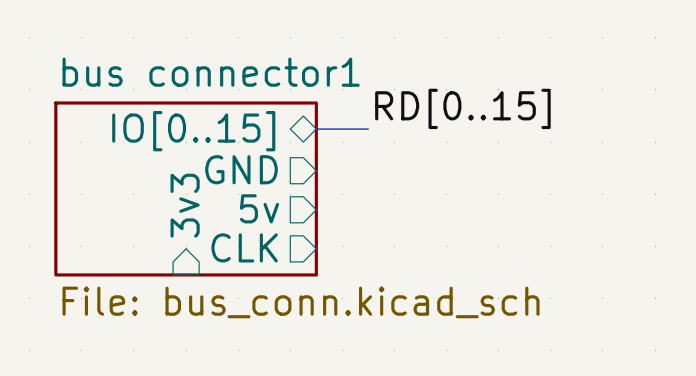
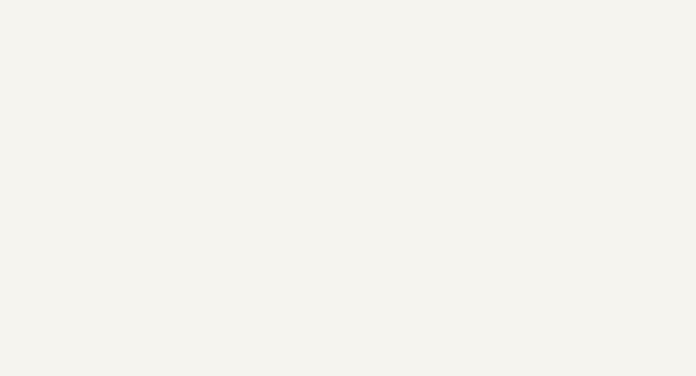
label: RD[0..15] (462, 108) -> none
bus: (316, 129) (368, 129) -> none
sheet pin: IO[0..15] (193, 131) -> none
sheet pin: GND (241, 169) -> none
sheet bus connector1: File: bus_conn.kicad_sch (186, 188) -> none
sheet pin: 3v3 (185, 205) -> none
sheet pin: 5v (259, 208) -> none
sheet pin: CLK (244, 247) -> none

